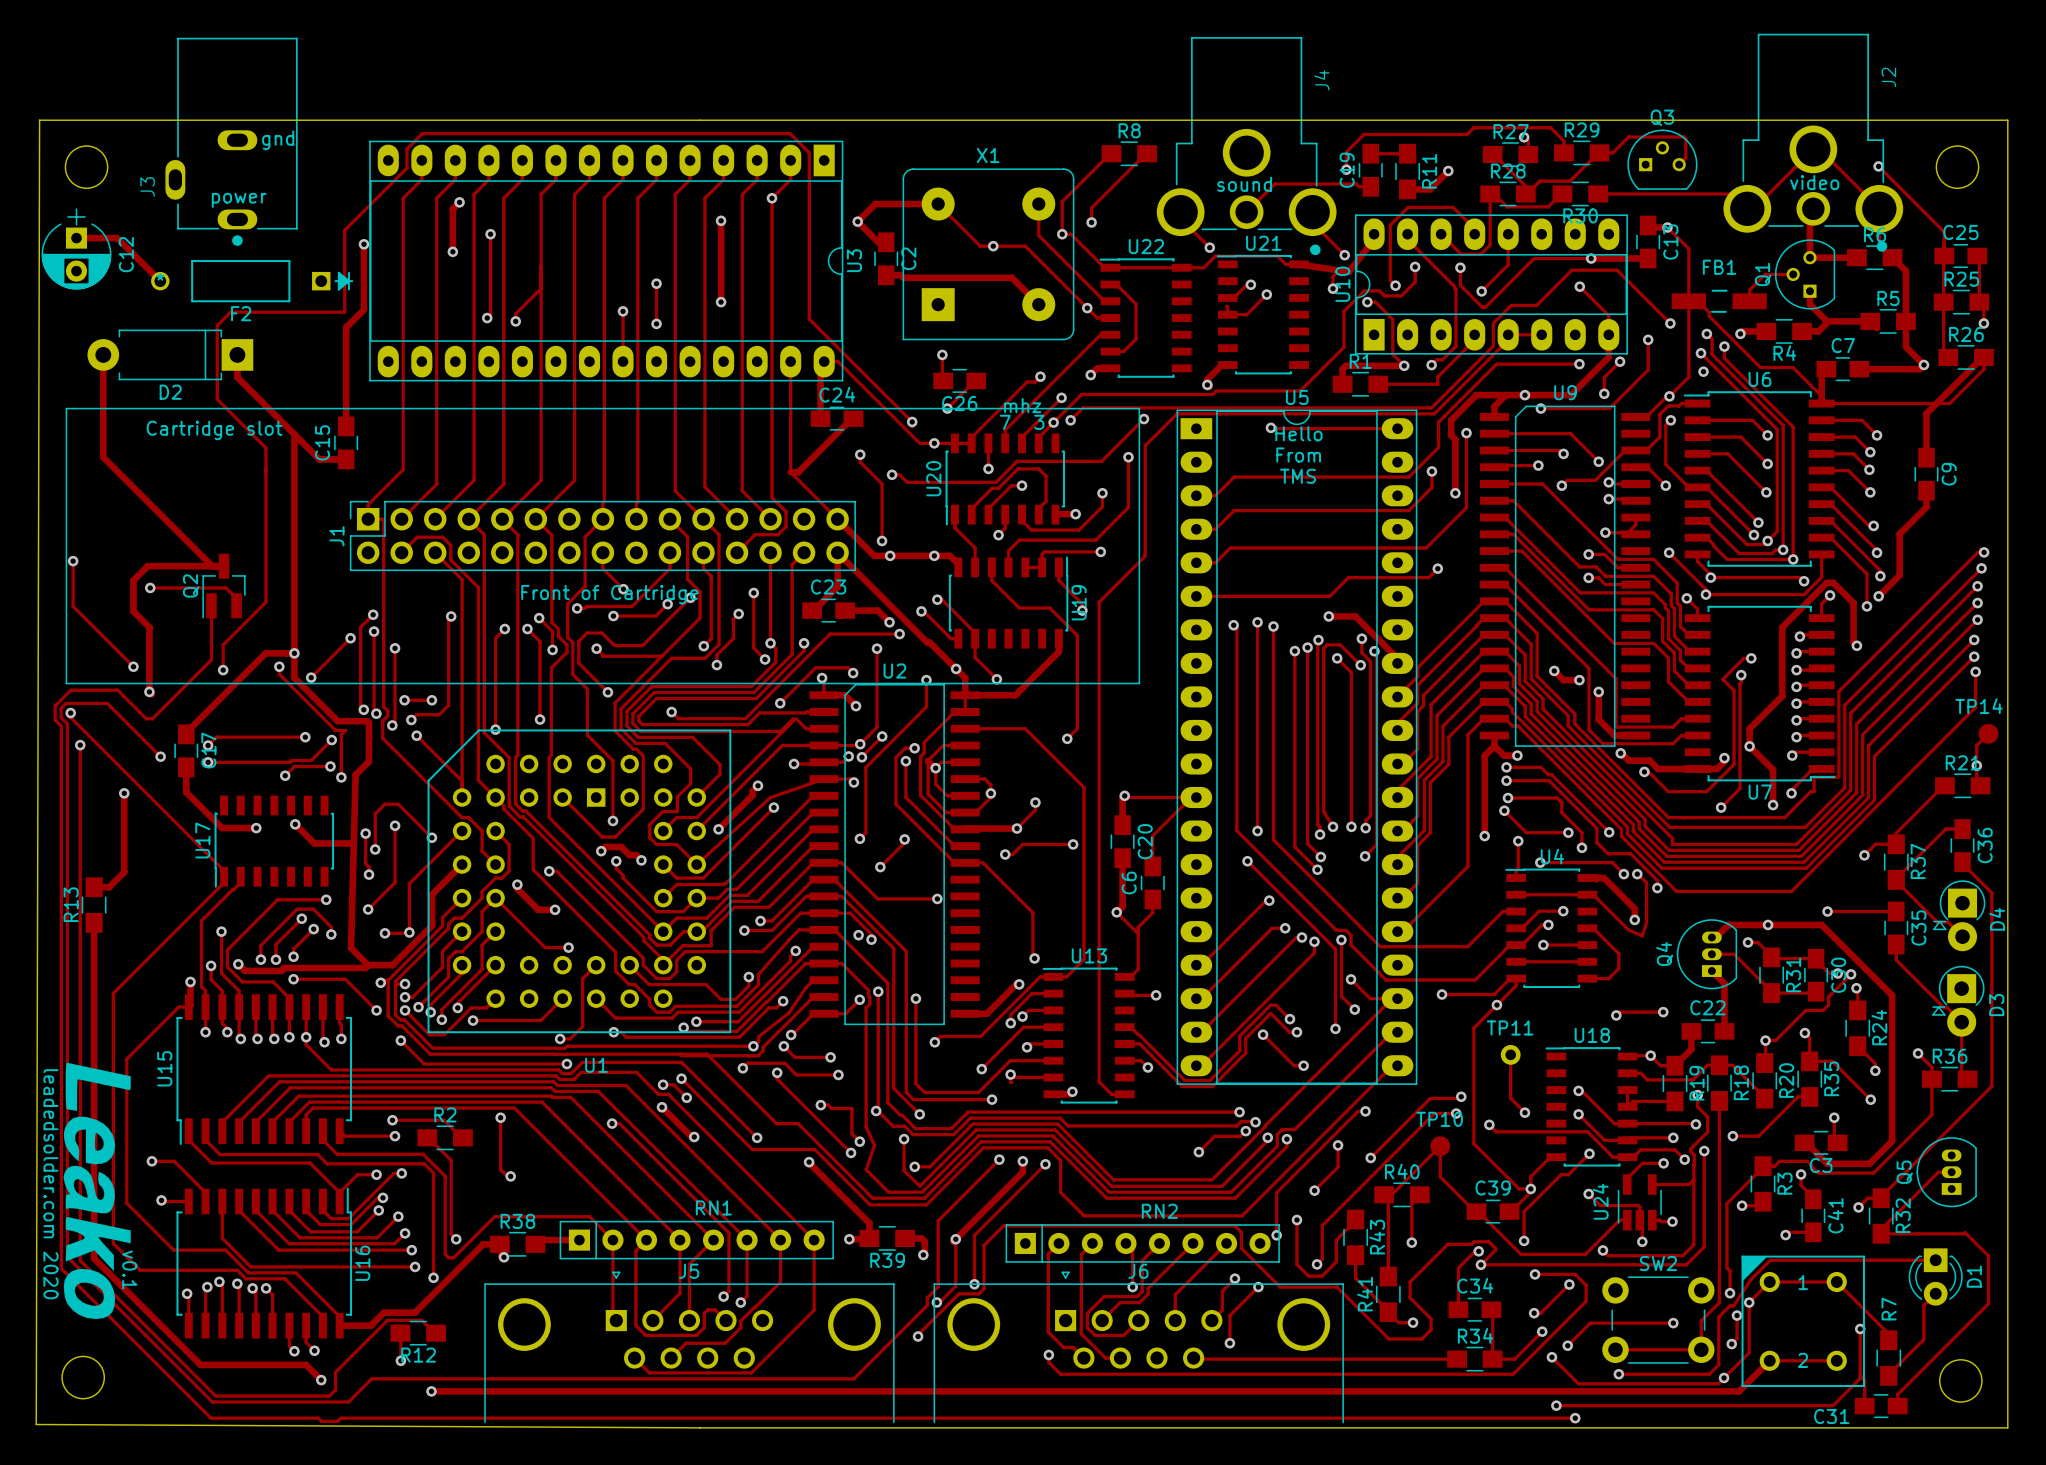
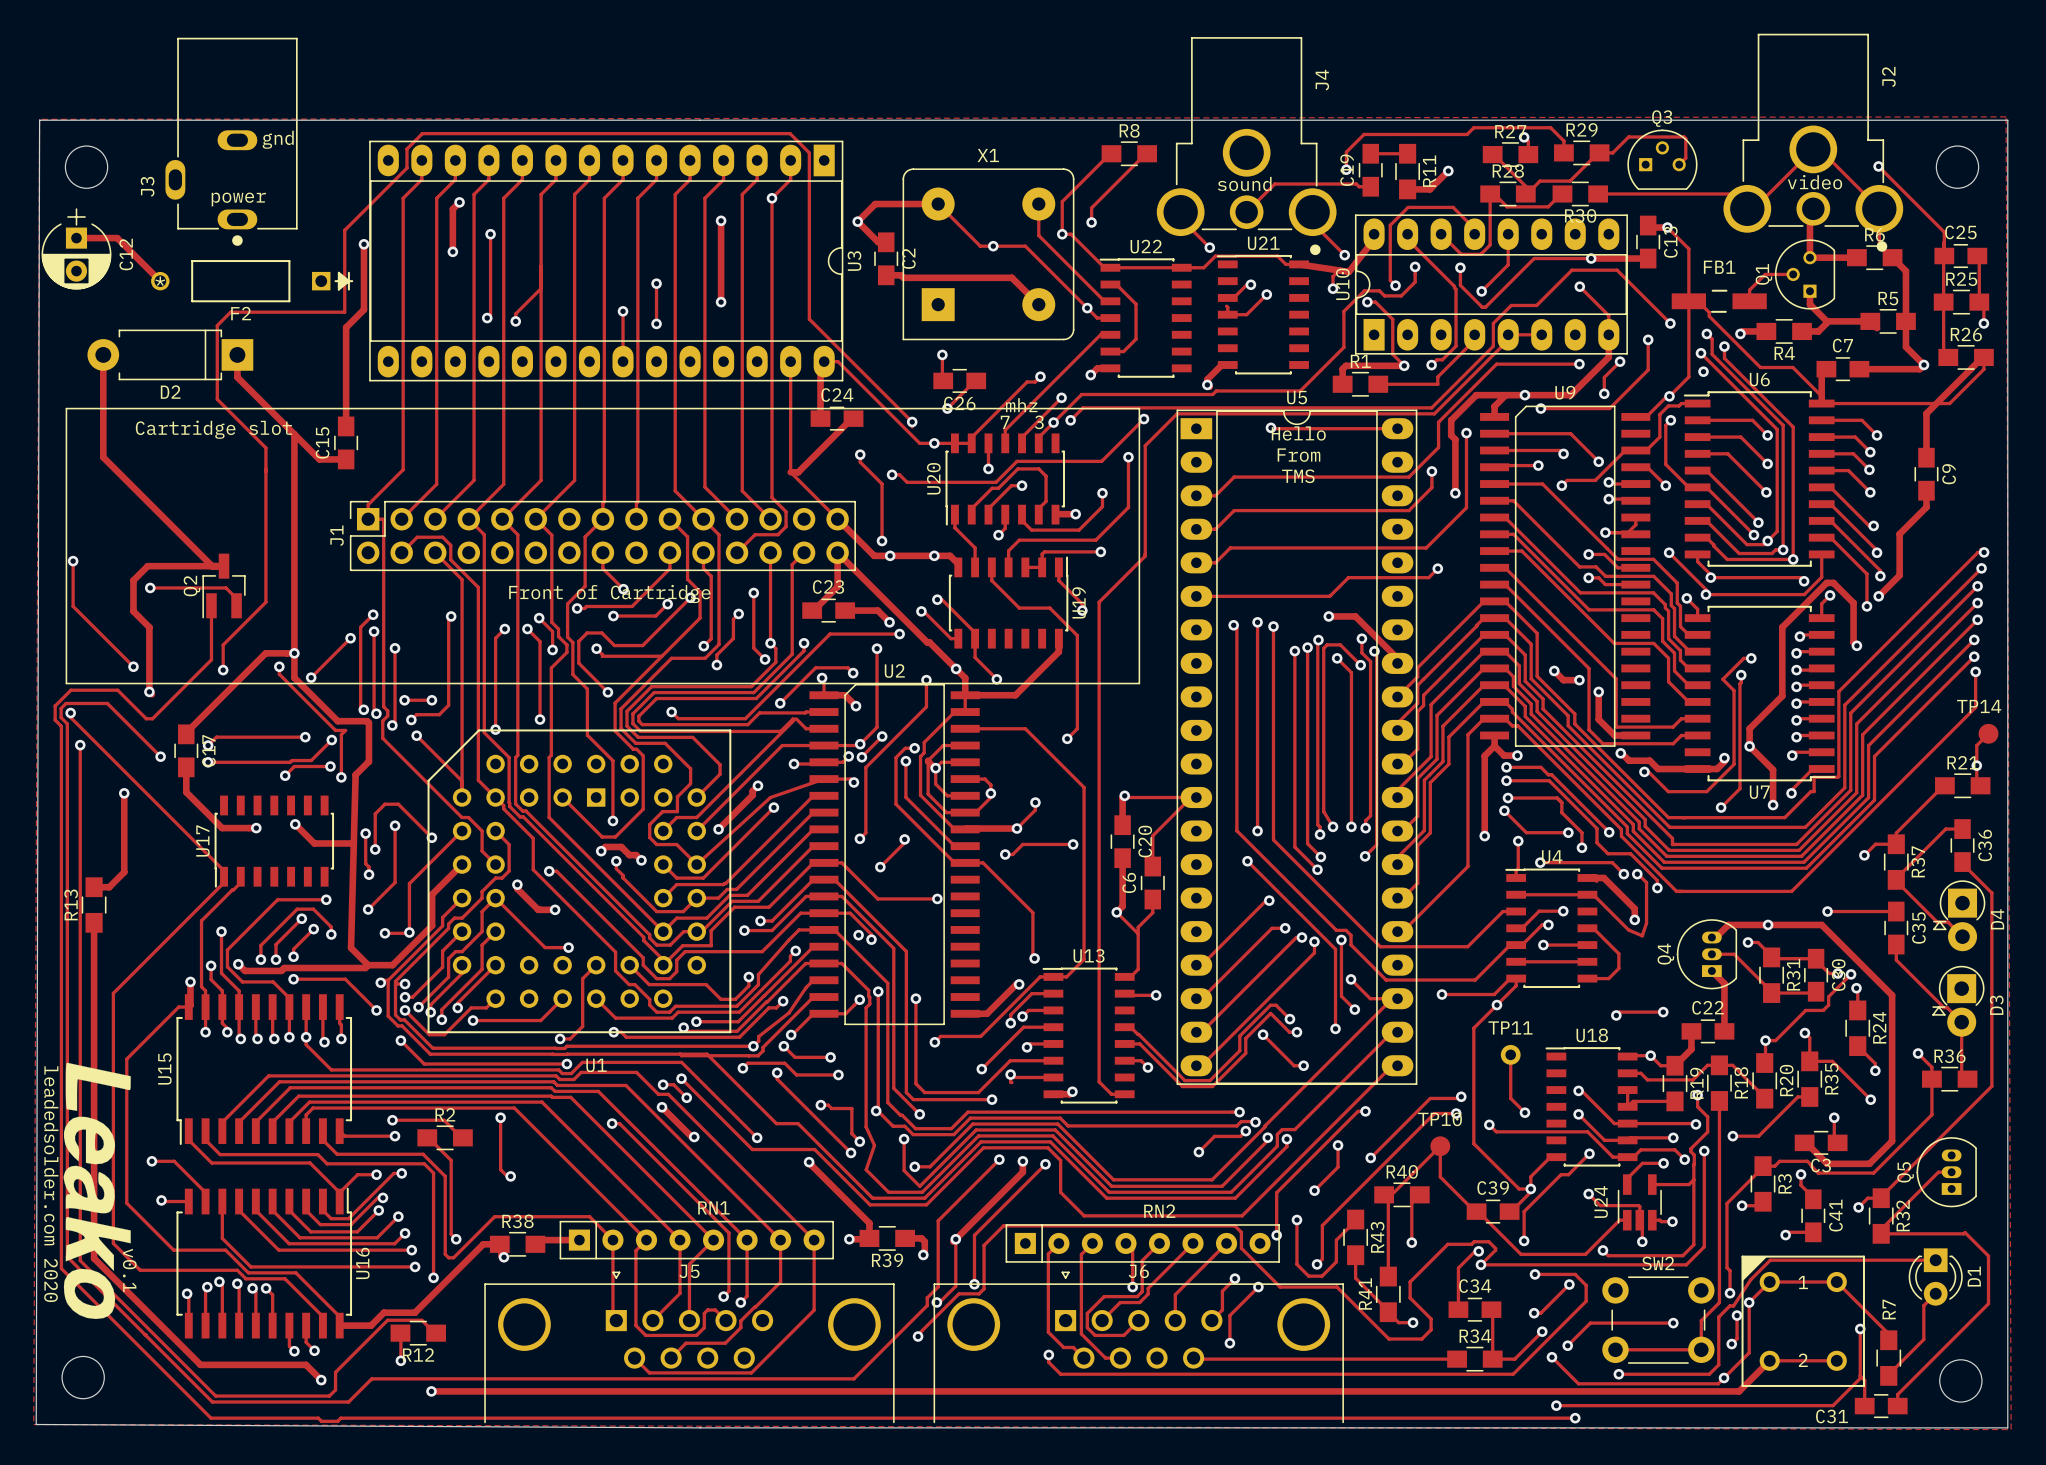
zone outline: none -> (2006, 116) (2011, 1429) (33, 1424) (39, 119) (2006, 116)

